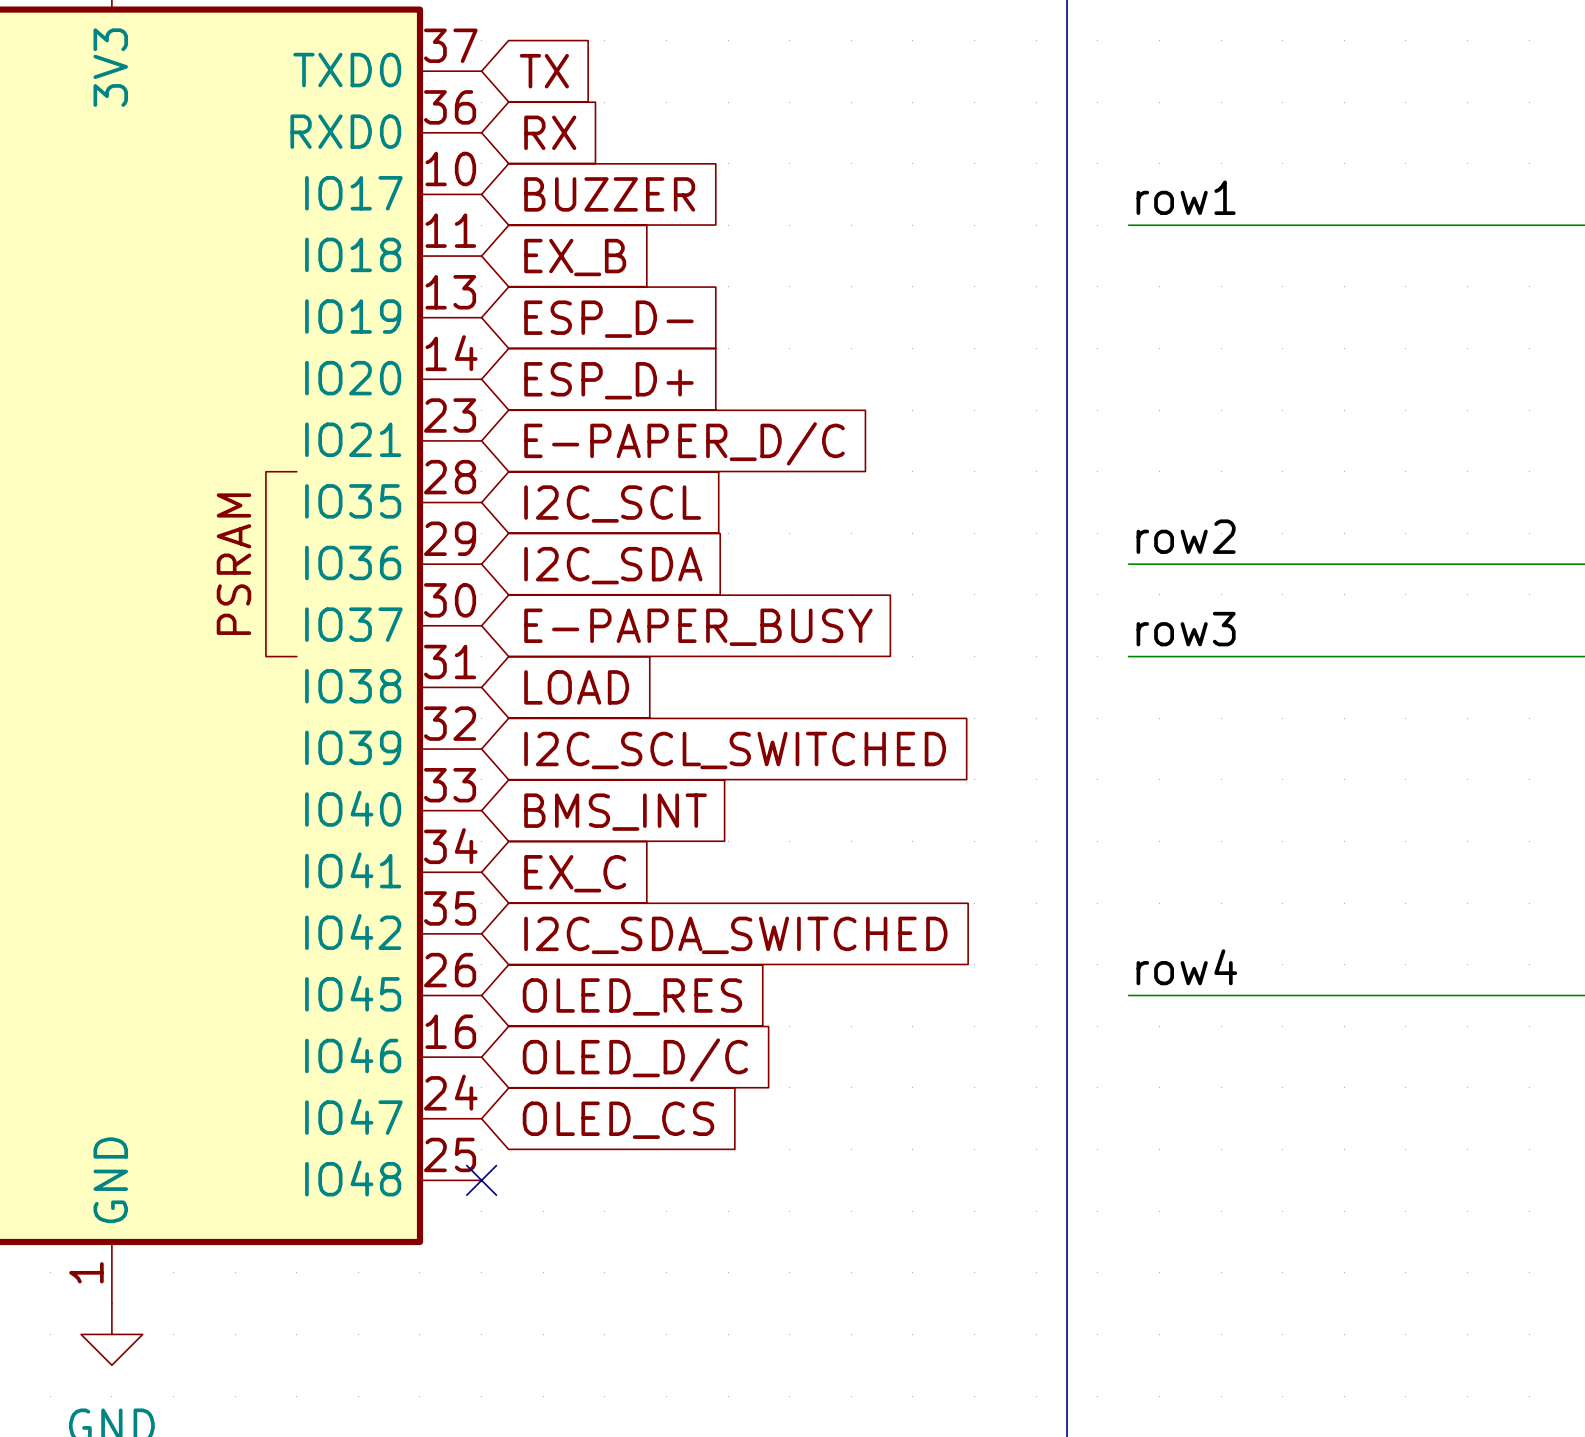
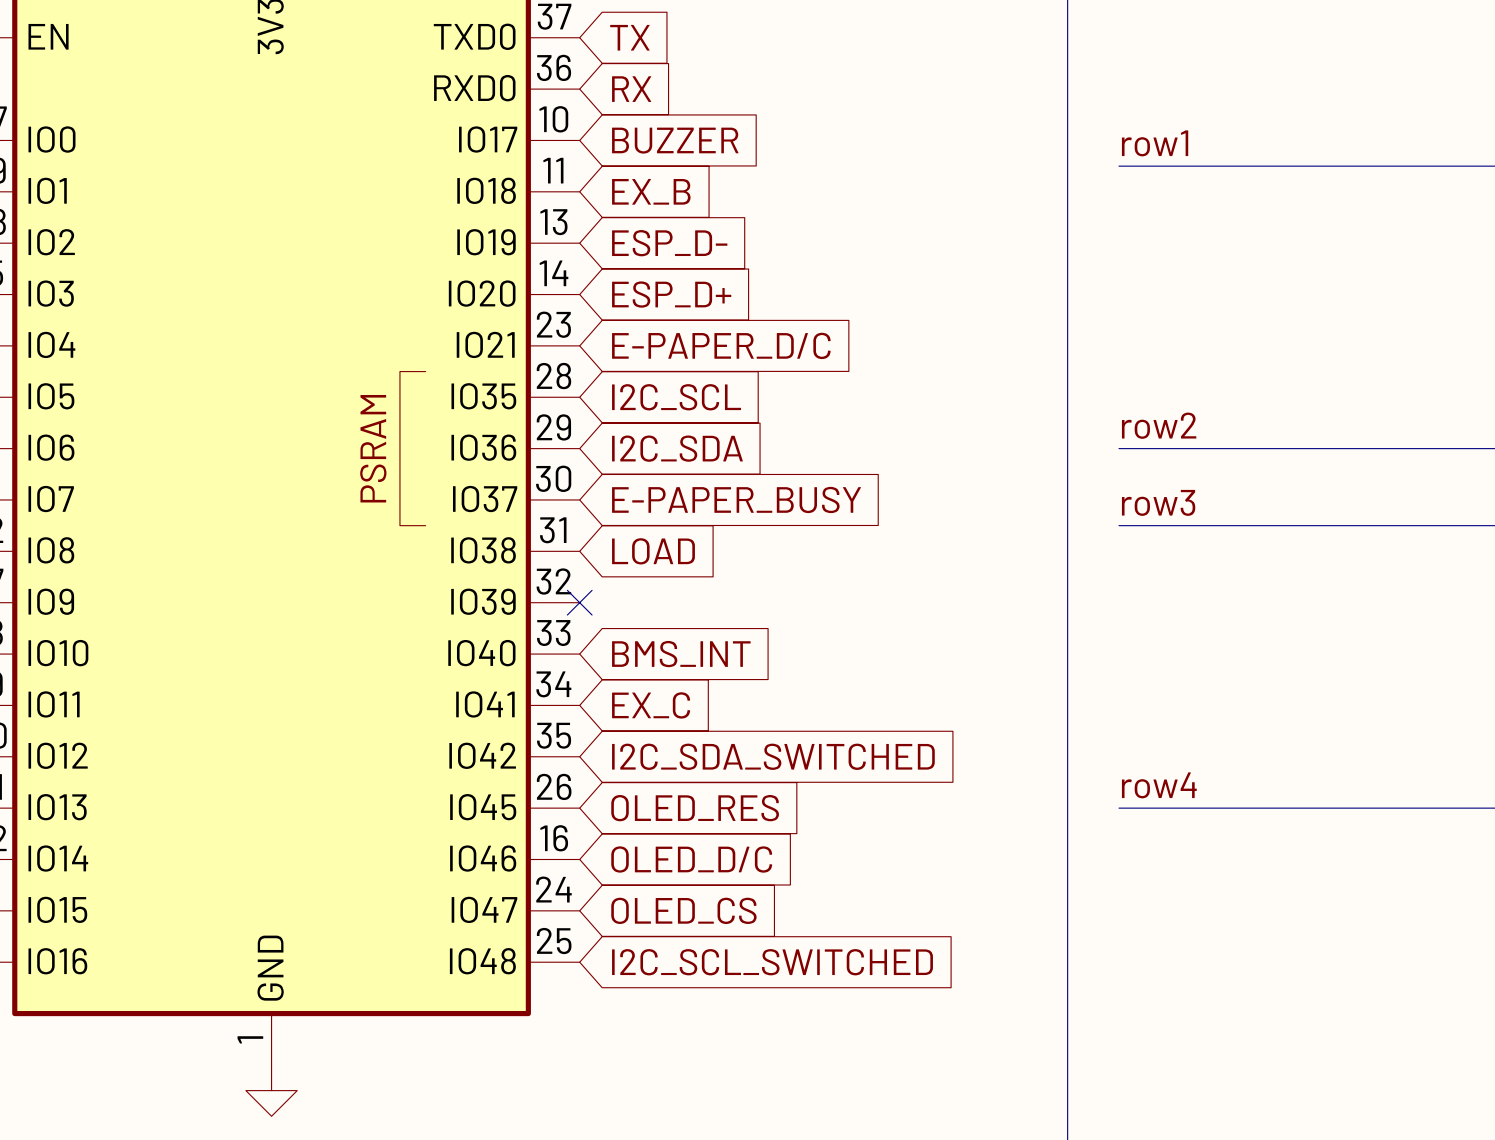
no-connect mark: none -> (579, 602)
global label position: I2C_SCL_SWITCHED (735, 750) -> I2C_SCL_SWITCHED (772, 962)
no-connect mark: (481, 1180) -> none

